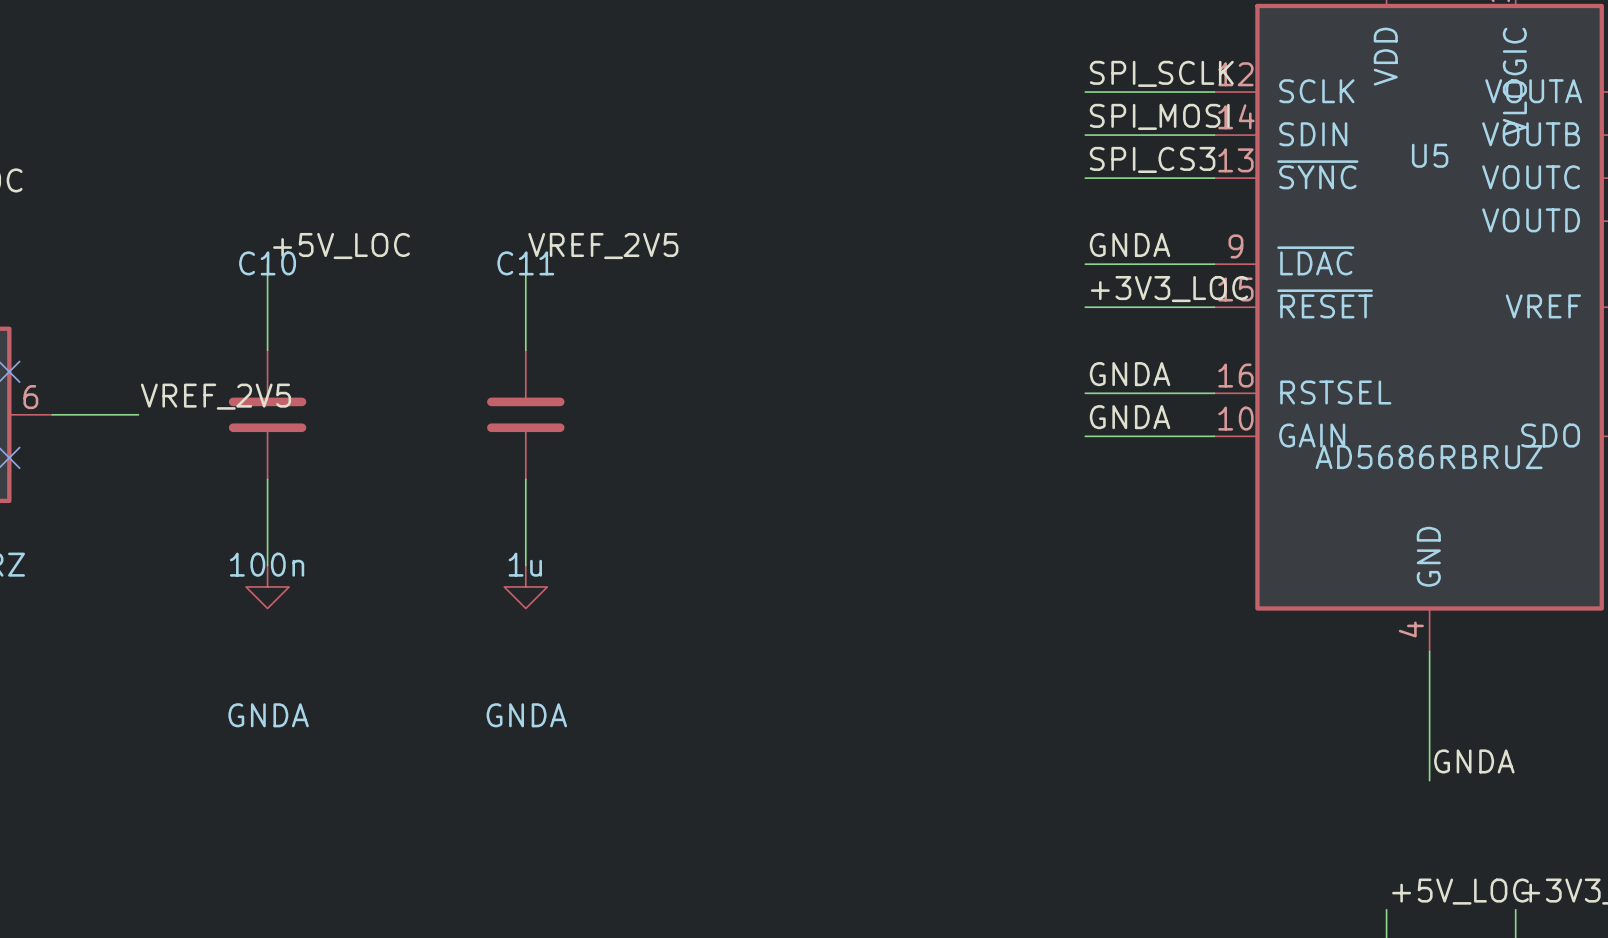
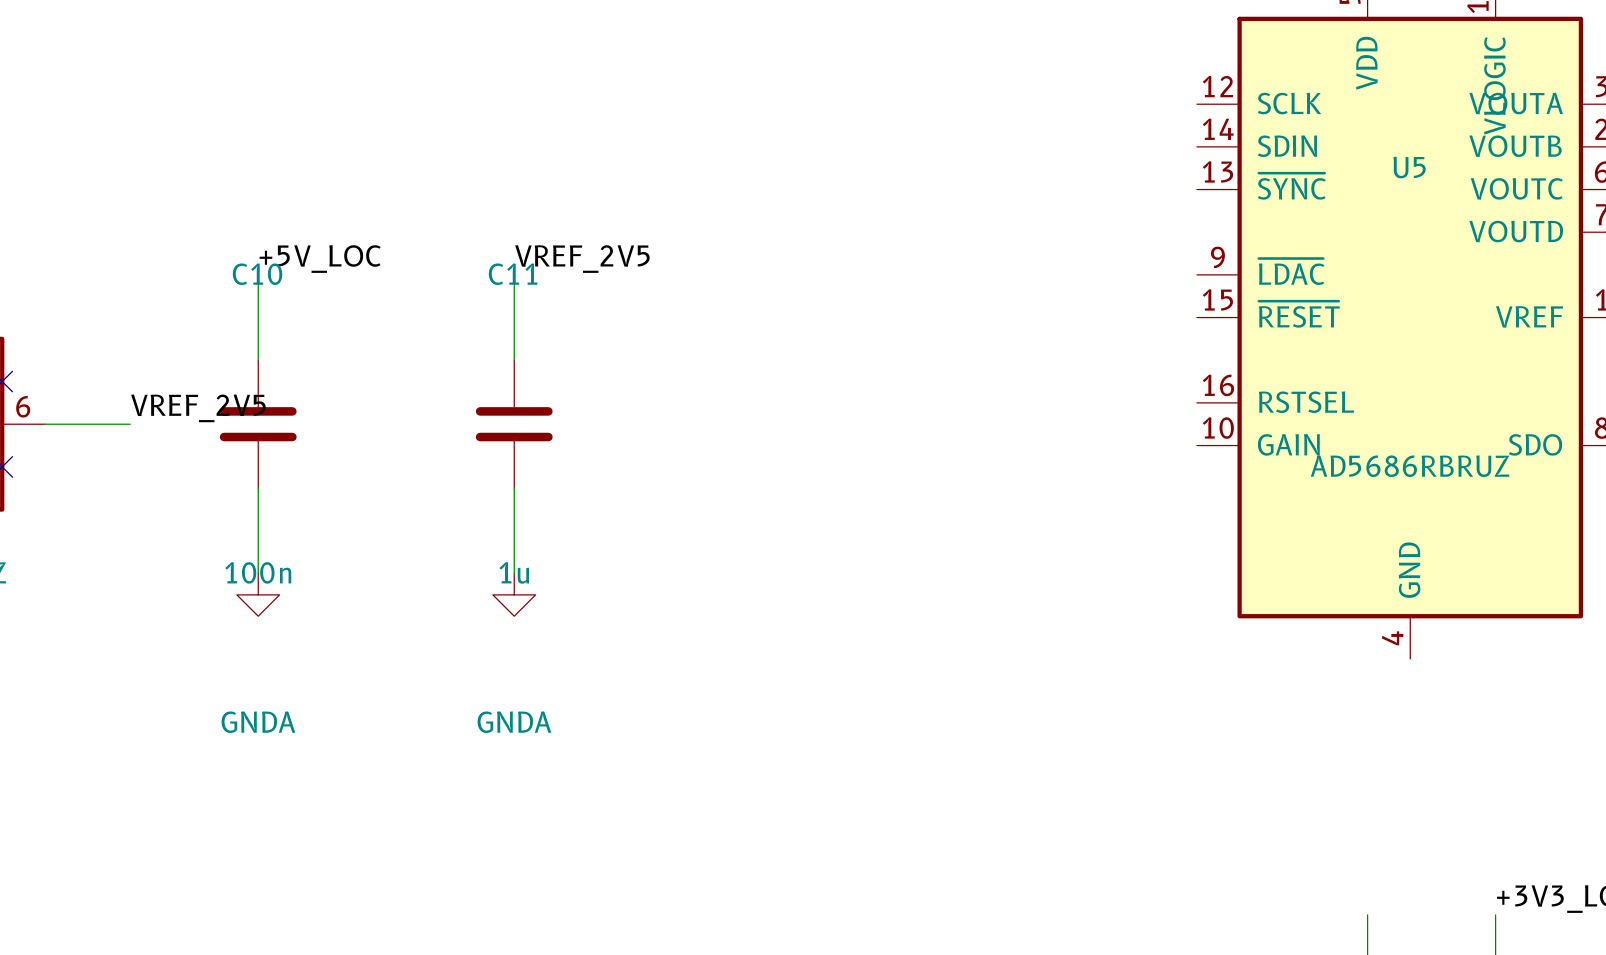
label: SPI_SCLK (1161, 73) -> none
wire: (1085, 92) (1214, 92) -> none
label: SPI_MOSI (1159, 116) -> none
wire: (1085, 135) (1214, 135) -> none
label: SPI_CS3 (1152, 159) -> none
wire: (1085, 178) (1214, 178) -> none
label: GNDA (1130, 244) -> none
wire: (1085, 264) (1214, 264) -> none
label: +3V3_LOC (1169, 289) -> none
wire: (1085, 307) (1214, 307) -> none
label: GNDA (1130, 374) -> none
wire: (1085, 393) (1214, 393) -> none
label: GNDA (1130, 417) -> none
wire: (1085, 436) (1214, 436) -> none
wire: (1429, 651) (1429, 780) -> none
label: GNDA (1474, 761) -> none
label: +5V_LOC (1460, 891) -> none

